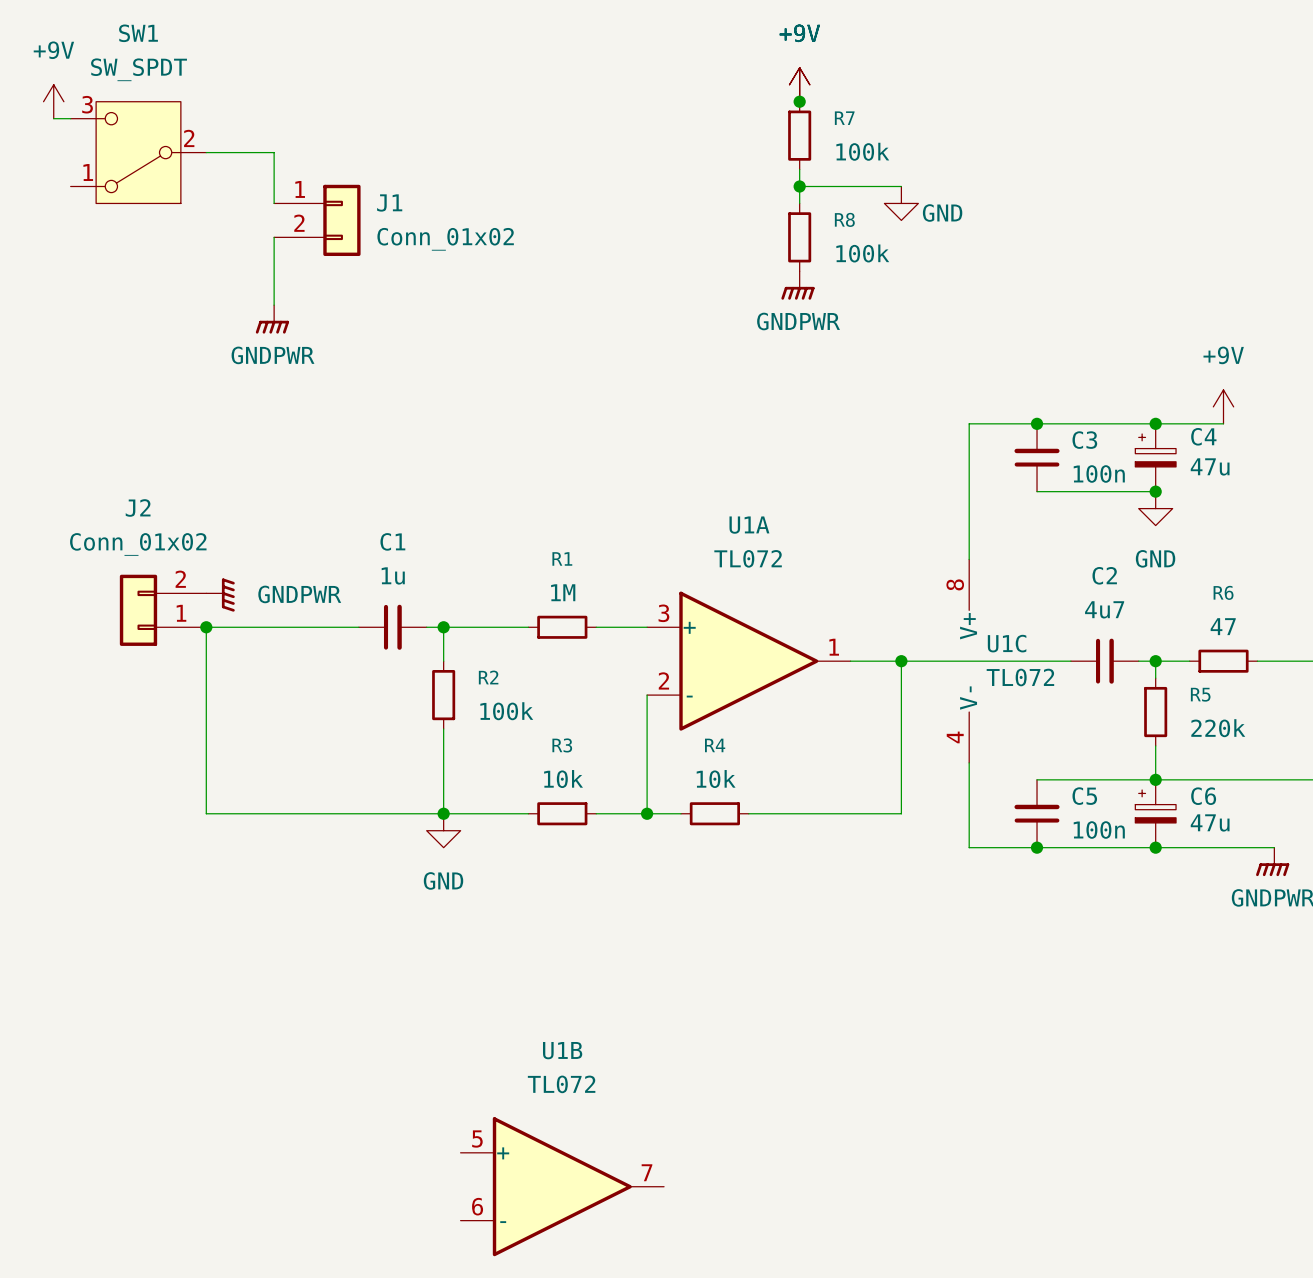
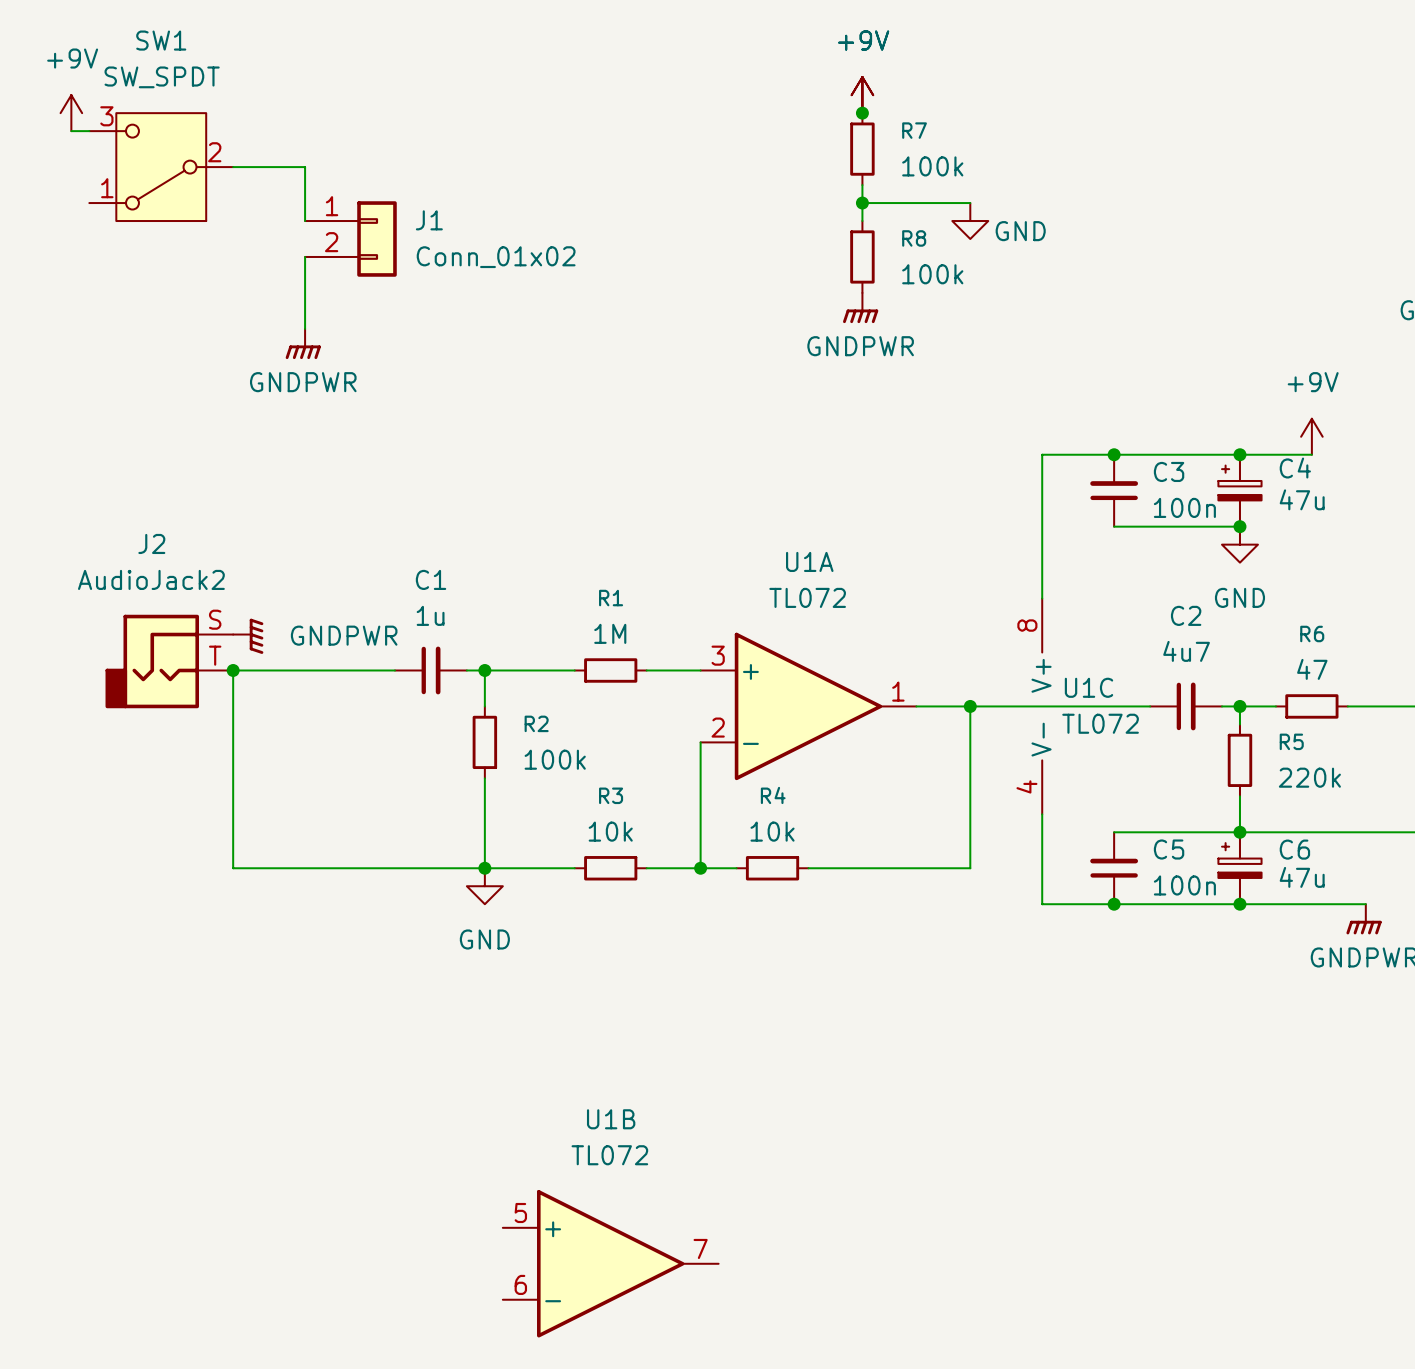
J2 value: Conn_01x02 (138, 544) -> AudioJack2 (151, 579)
J2 symbol: [119, 574, 207, 646] -> [105, 614, 234, 709]

